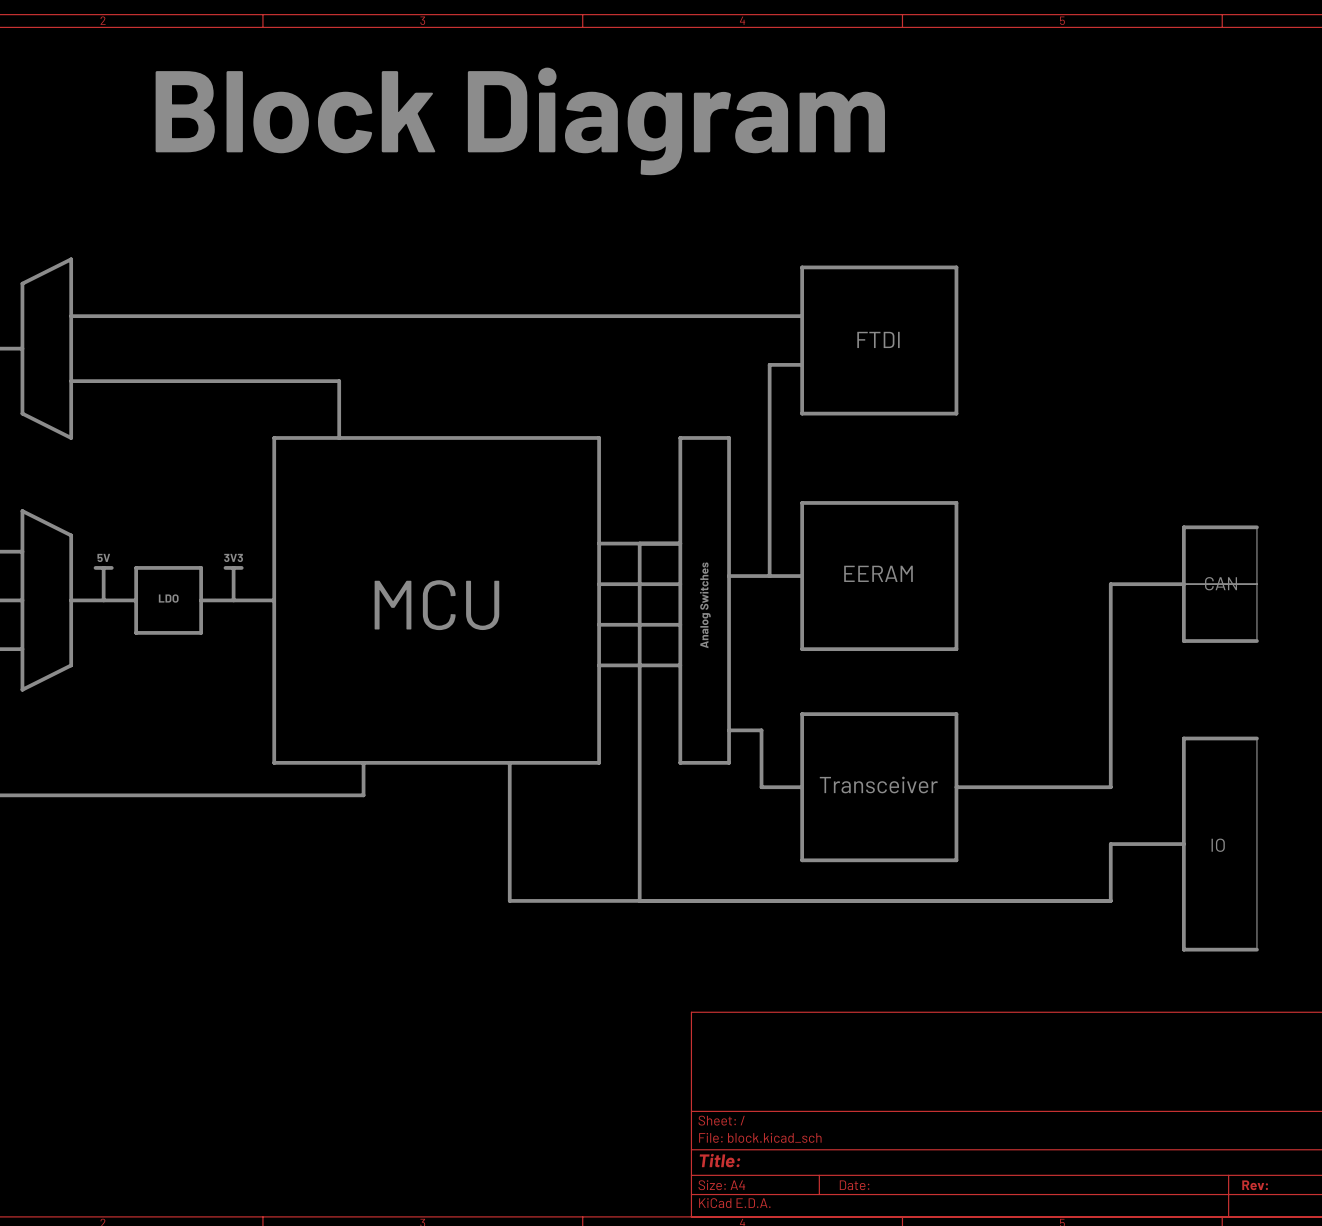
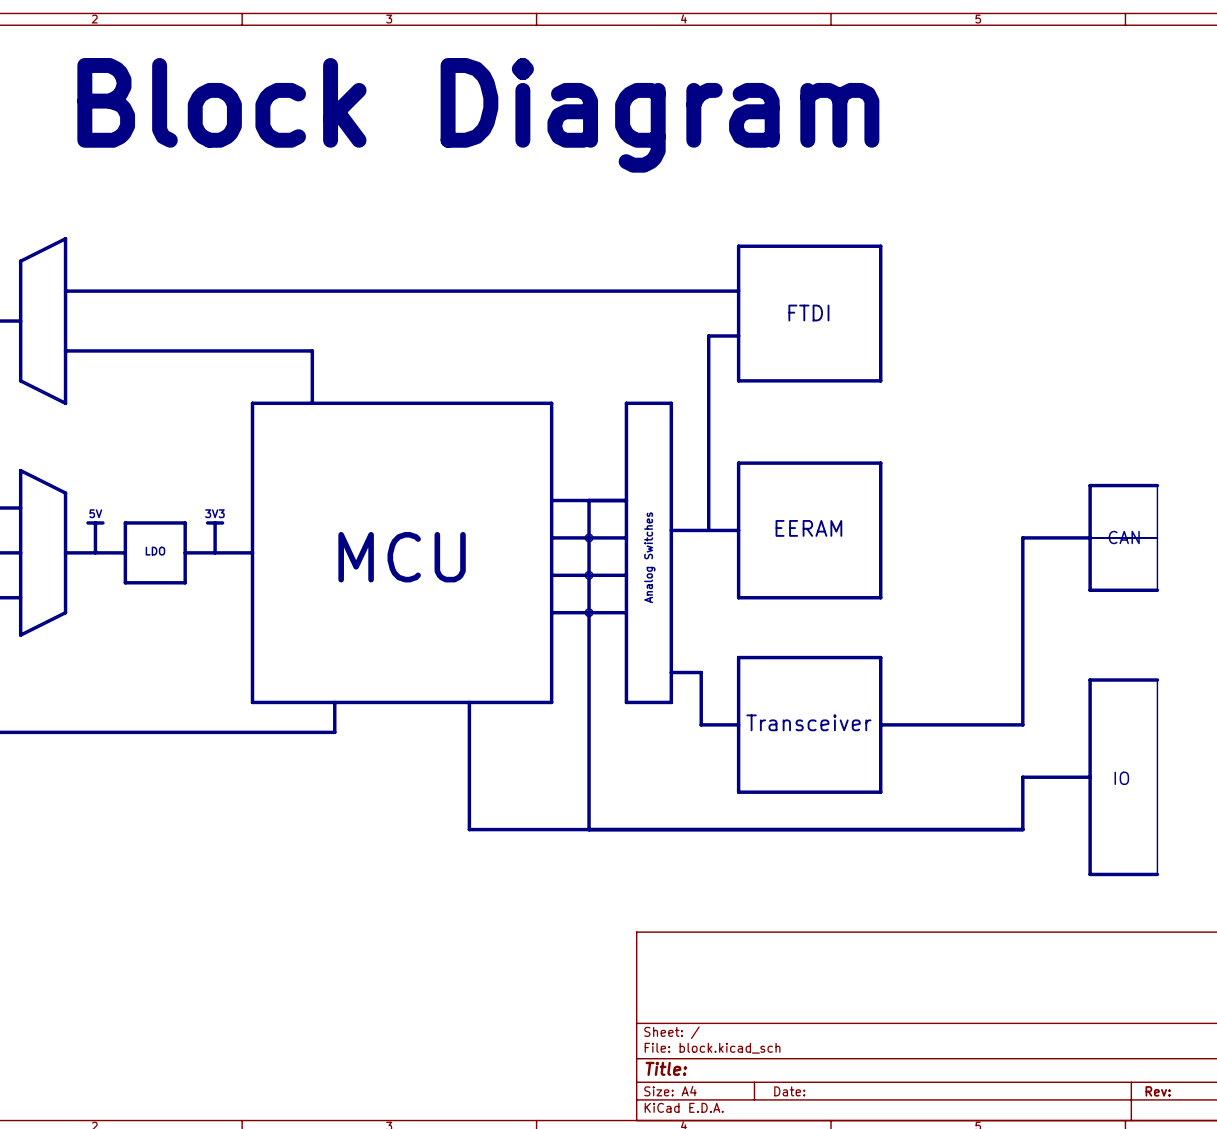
drawing: none -> [585, 534, 593, 542]
drawing: none -> [585, 571, 593, 580]
drawing: none -> [585, 608, 593, 617]

